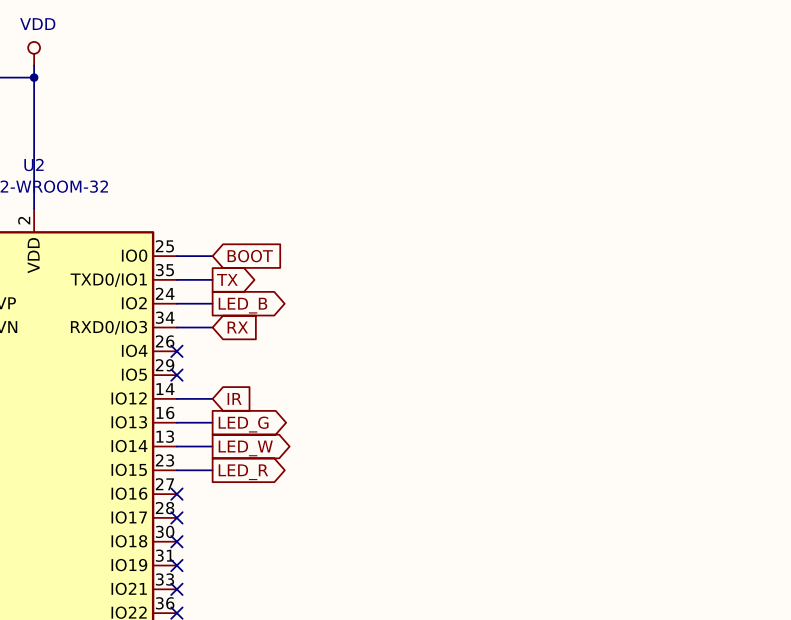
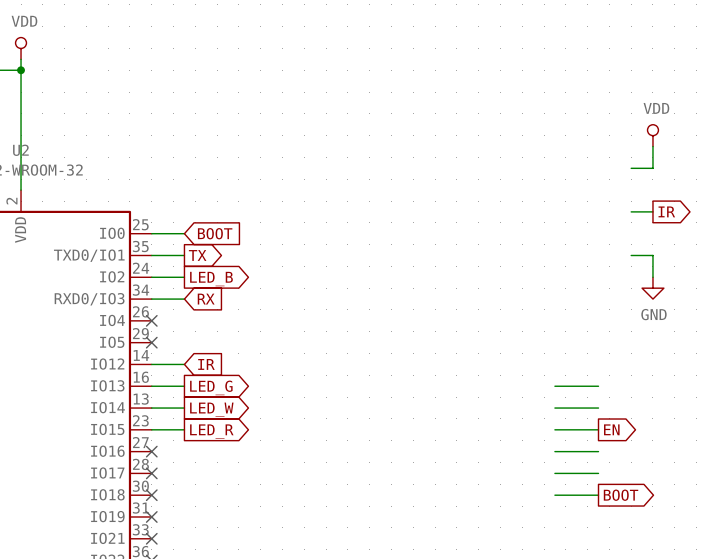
power symbol: none -> VDD (652, 135)
wire: none -> (652, 146) (652, 168) (631, 168)
wire: none -> (631, 211) (652, 211)
global label: none -> IR (666, 211)
wire: none -> (631, 255) (652, 255) (652, 277)
power symbol: none -> GND (652, 288)
wire: none -> (554, 386) (598, 386)
wire: none -> (554, 408) (598, 408)
wire: none -> (554, 429) (598, 429)
global label: none -> EN (611, 429)
wire: none -> (554, 451) (598, 451)
wire: none -> (554, 473) (598, 473)
wire: none -> (554, 495) (598, 495)
global label: none -> BOOT (621, 495)

